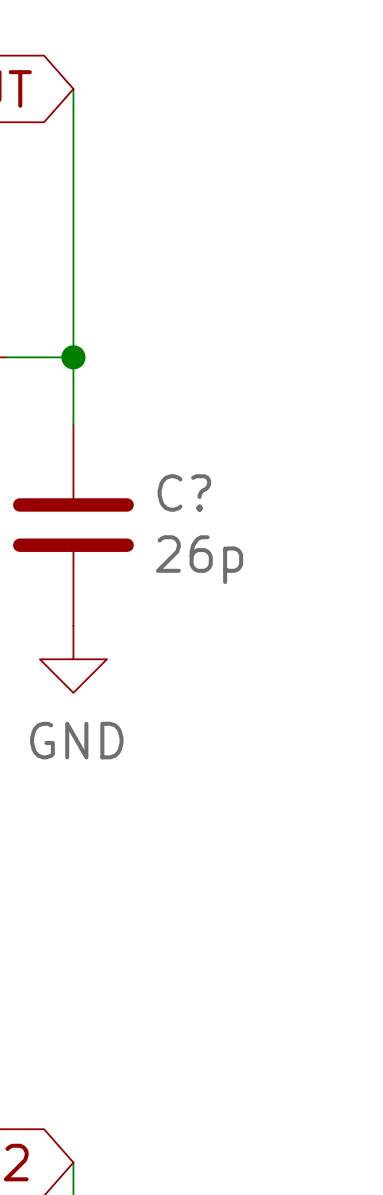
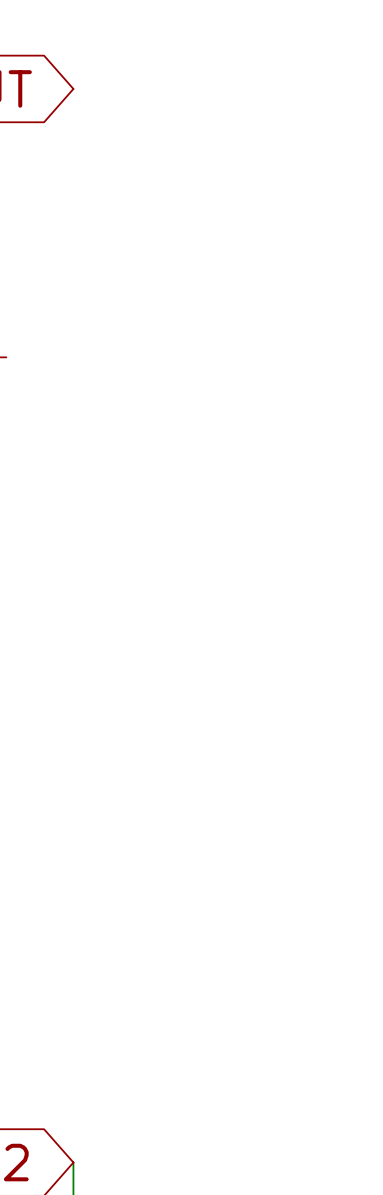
wire: (73, 88) (73, 424) -> none
wire: (6, 357) (73, 357) -> none
junction: (73, 357) -> none
C?: 26p (73, 525) -> none
power symbol: GND (73, 659) -> none

